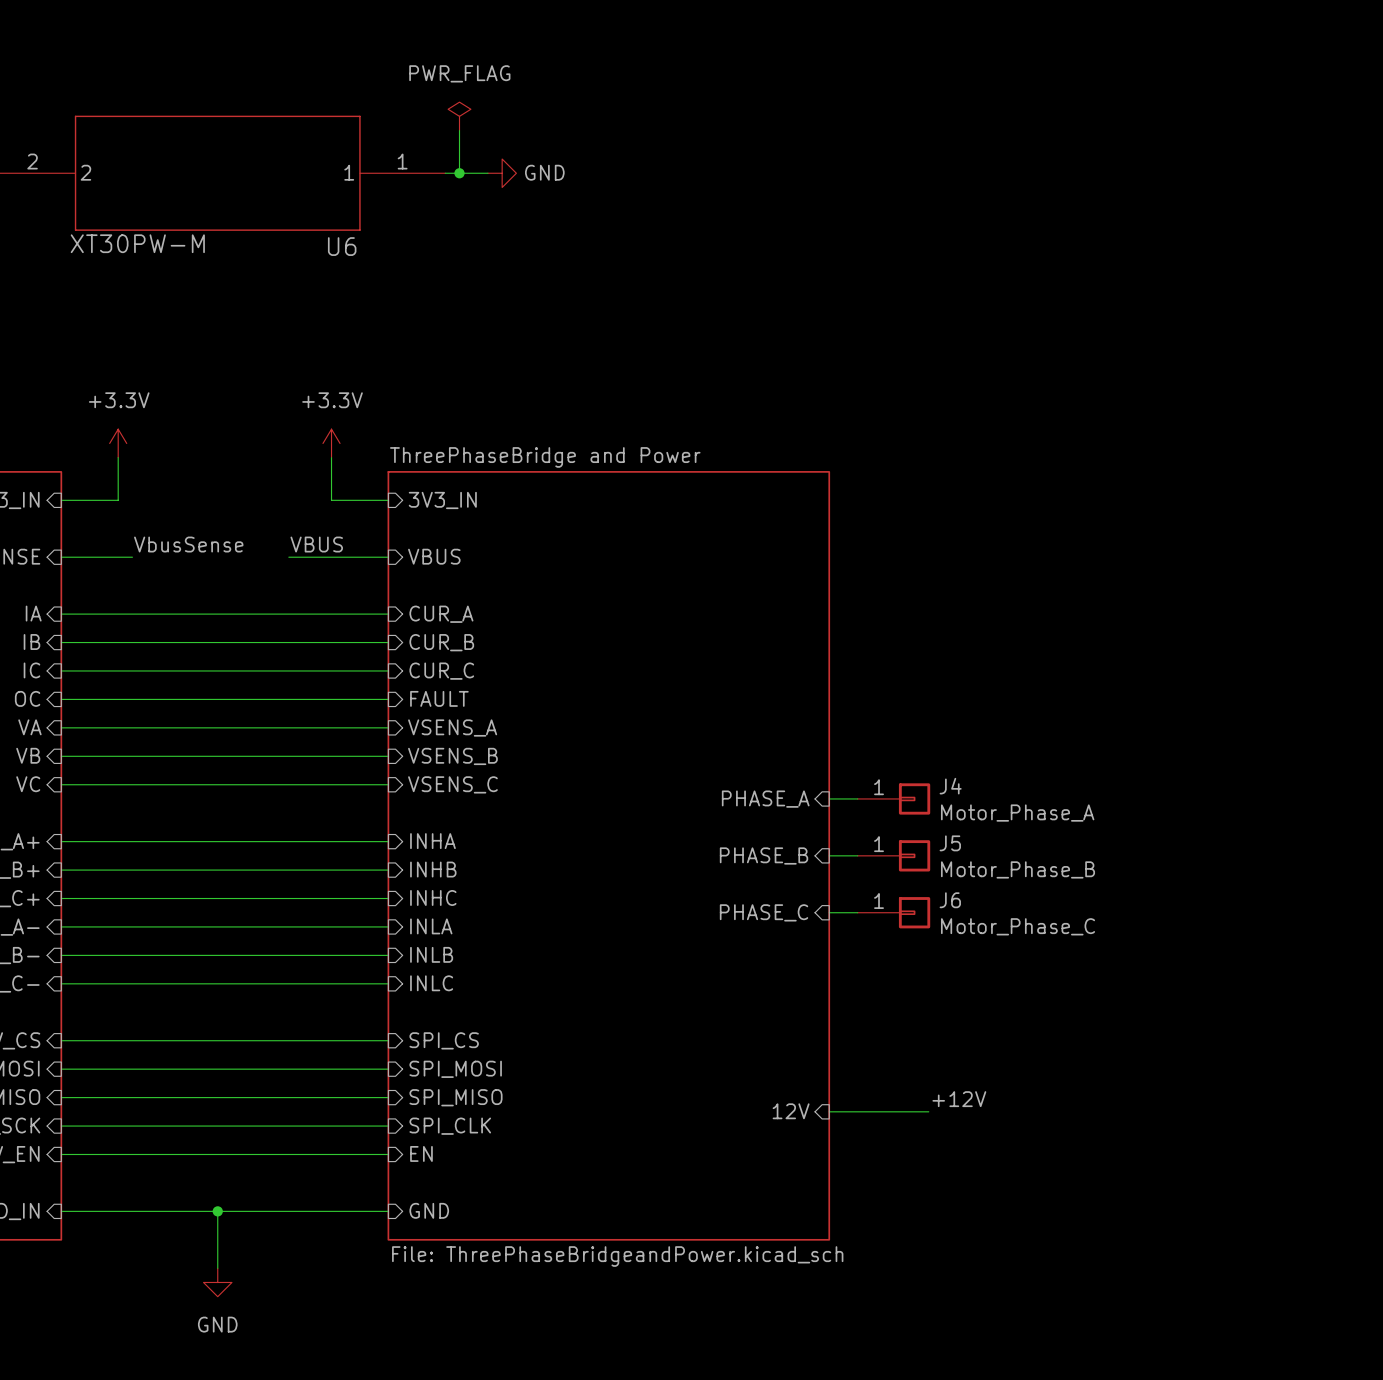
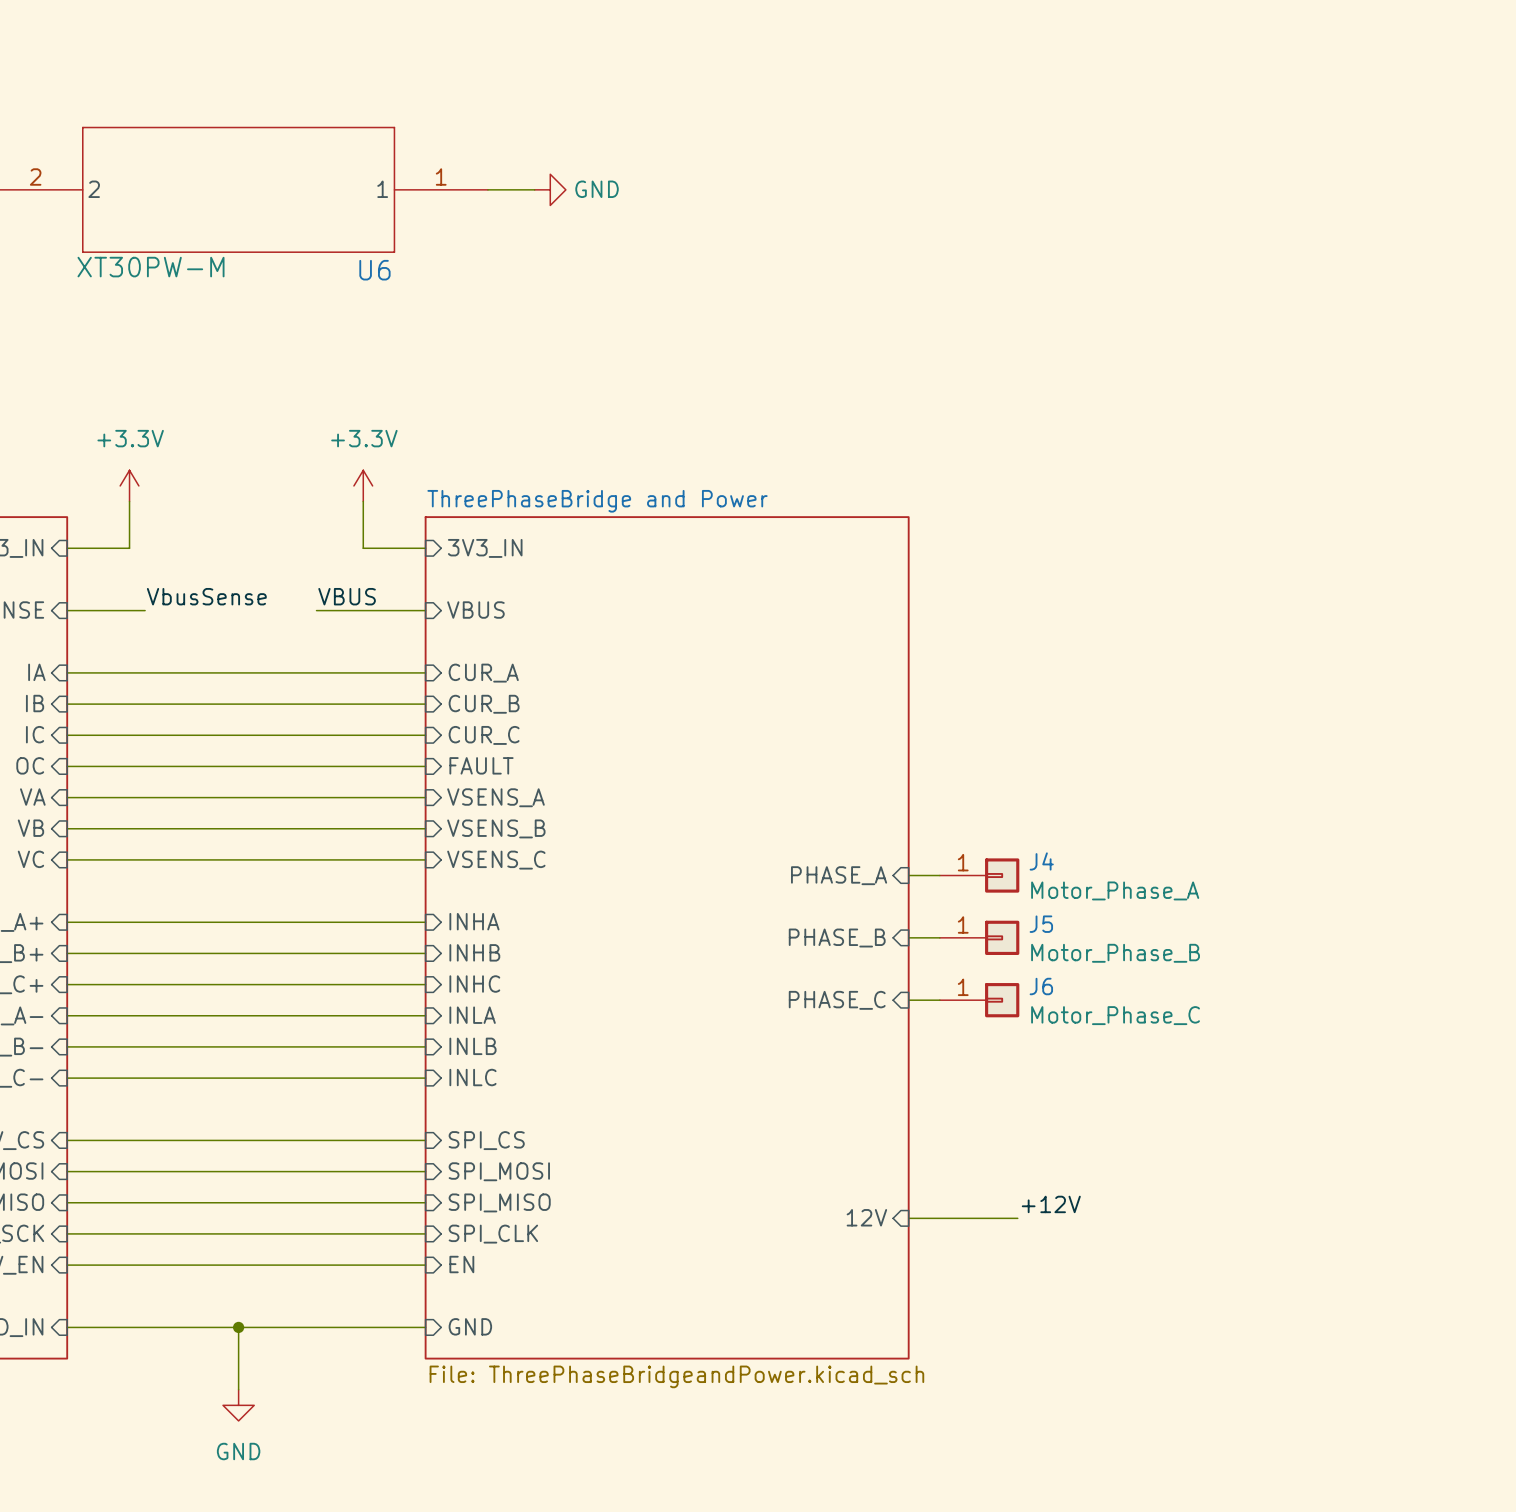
power symbol: PWR_FLAG (459, 116) -> none
wire: (459, 130) (459, 173) -> none
junction: (459, 173) -> none

